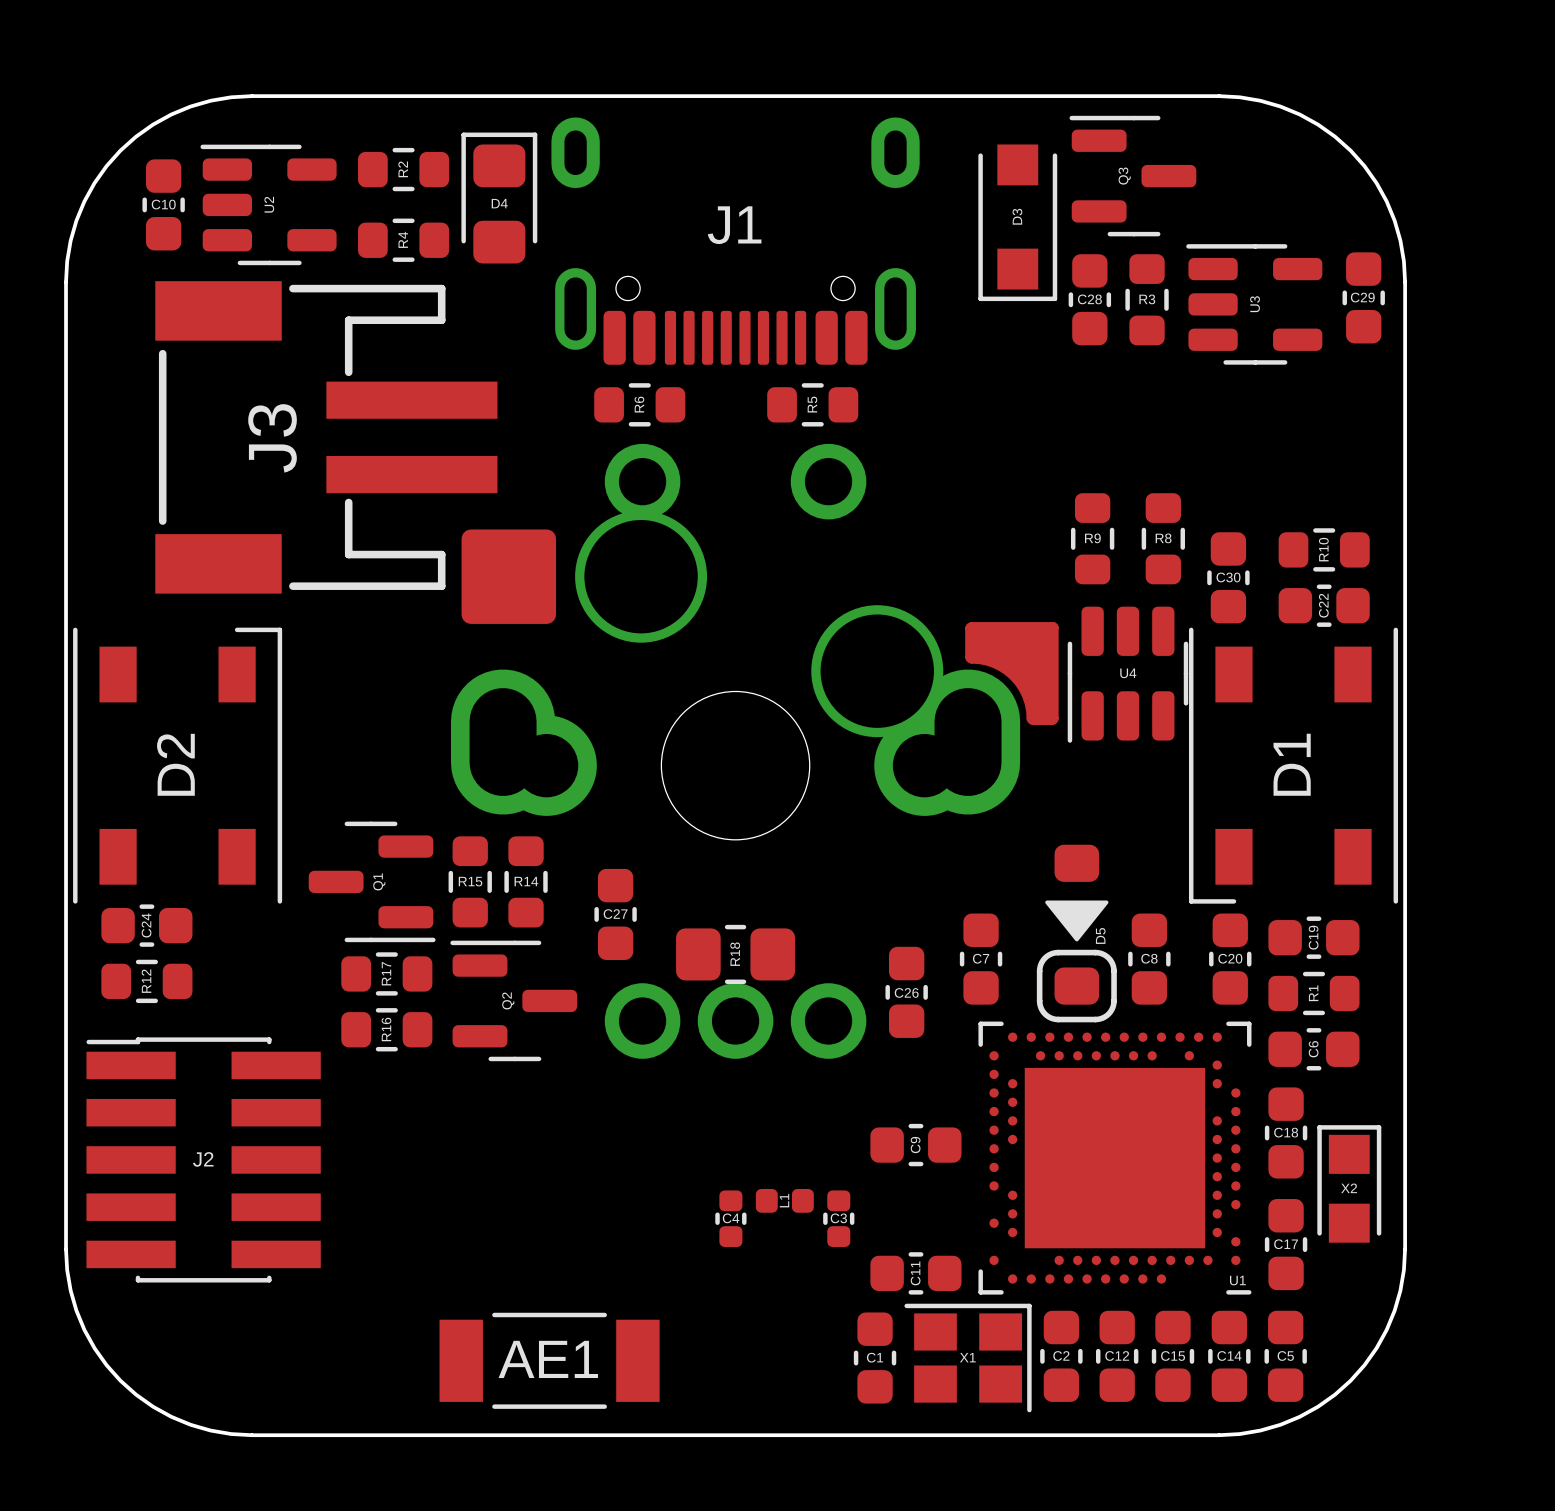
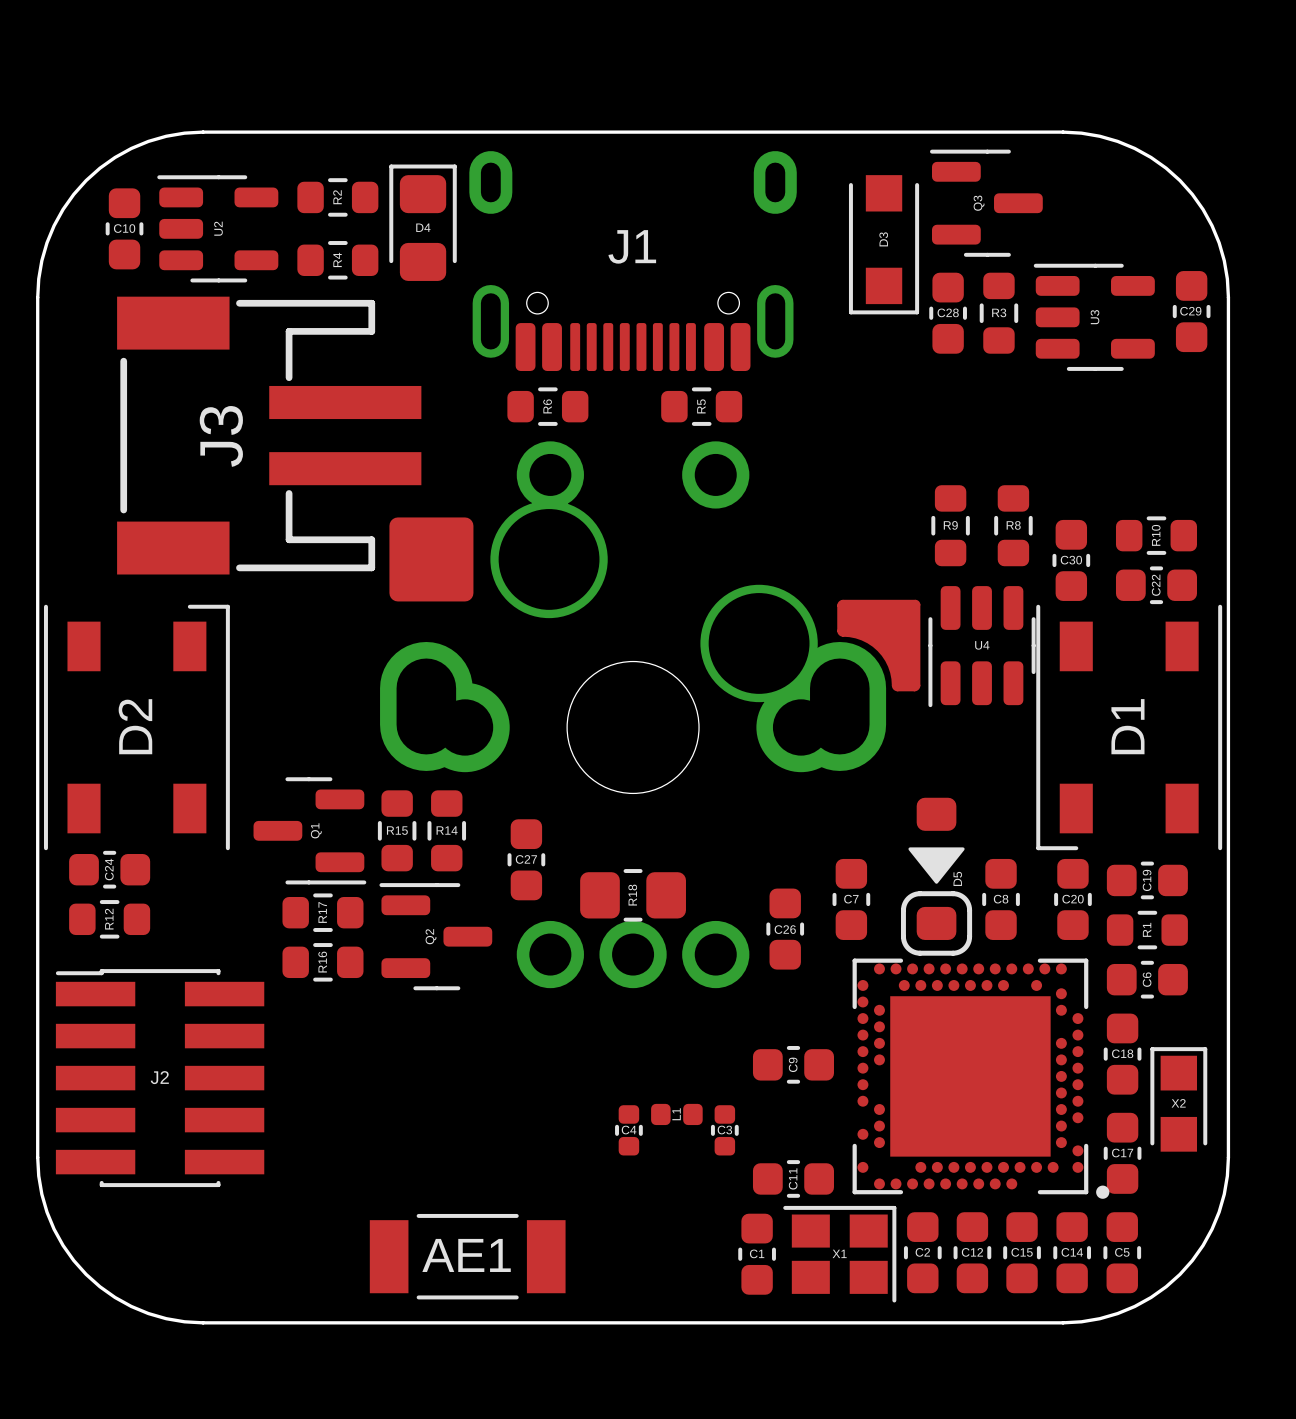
U1: (1114, 1158) -> none
part: none -> (980, 1078)

